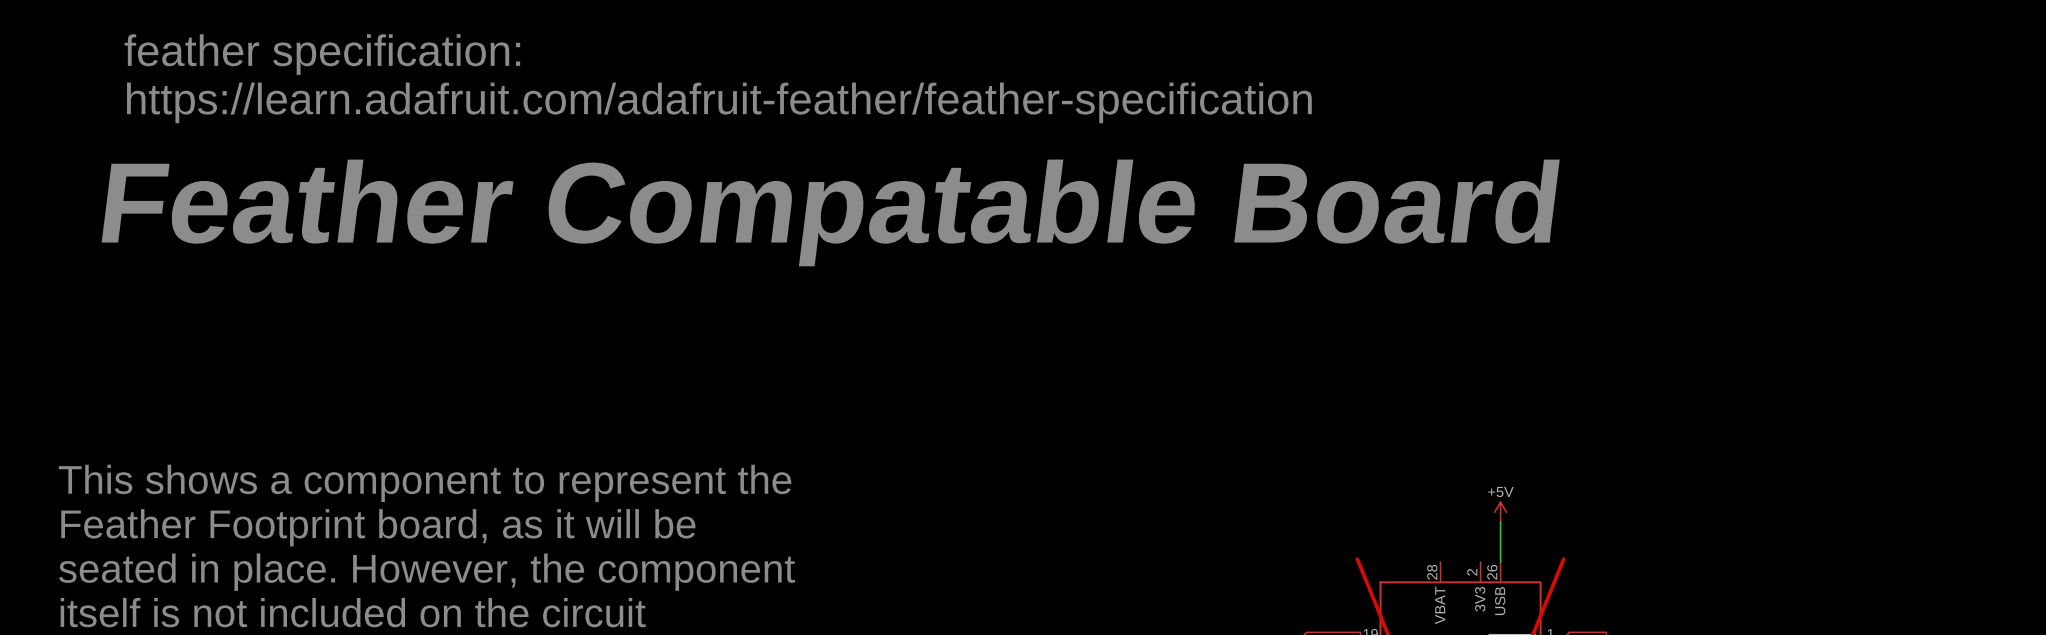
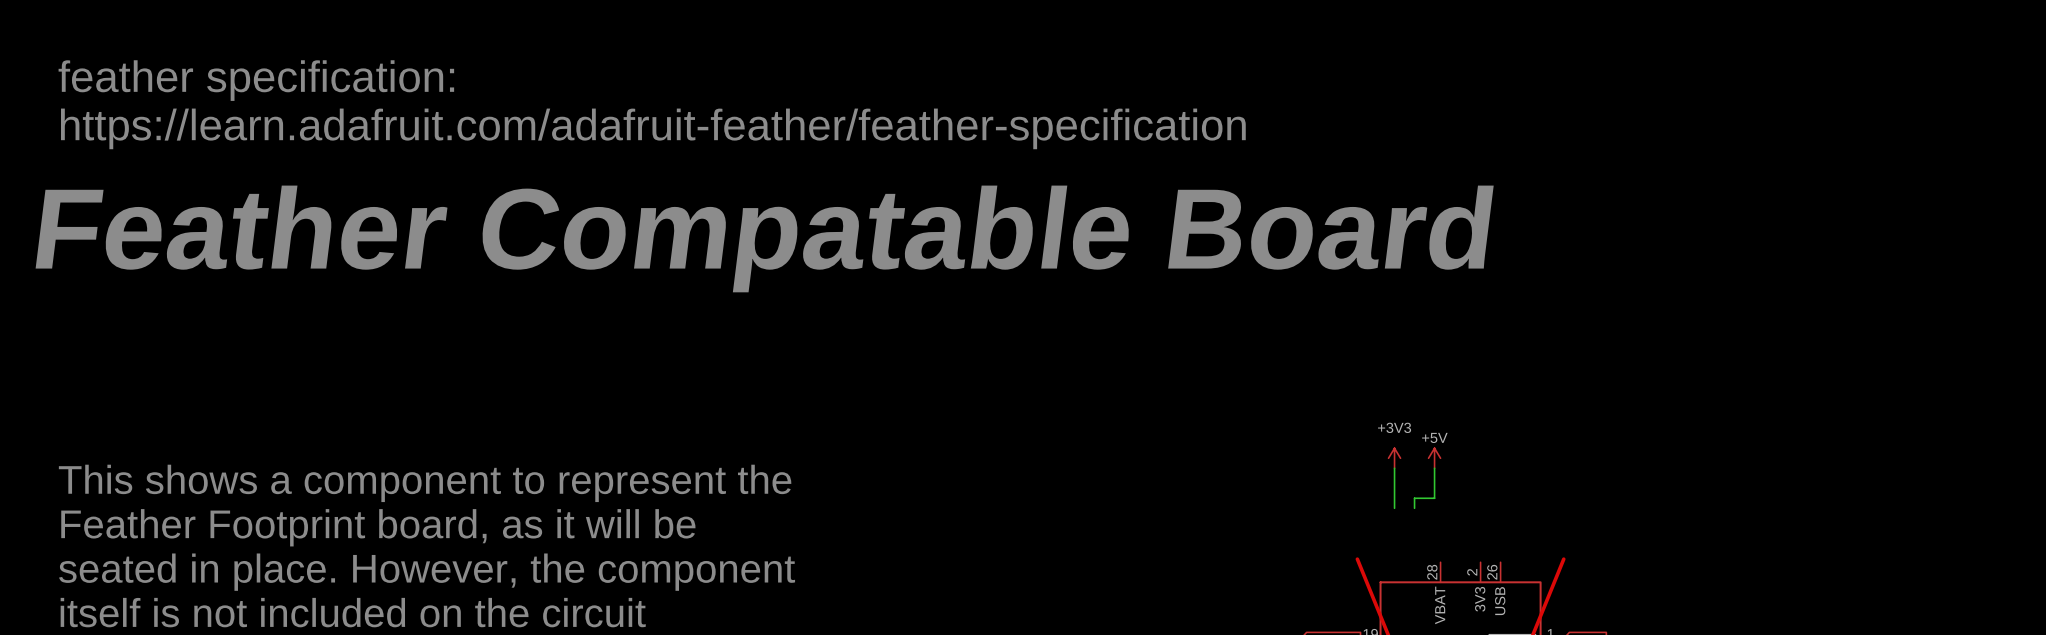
text position: feather specification: (322, 54) -> feather specification: (256, 80)
text position: https://learn.adafruit.com/adafruit-feather/feather-specification (719, 102) -> https://learn.adafruit.com/adafruit-feather/feather-specification (653, 128)
text position: Feather Compatable Board (830, 212) -> Feather Compatable Board (764, 238)
power symbol: none -> +3V3 (1394, 458)
wire: none -> (1434, 468) (1434, 498) (1414, 498) (1414, 508)
power symbol position: +5V (1500, 512) -> +5V (1434, 458)
wire: (1500, 522) (1500, 562) -> (1394, 468) (1394, 508)

